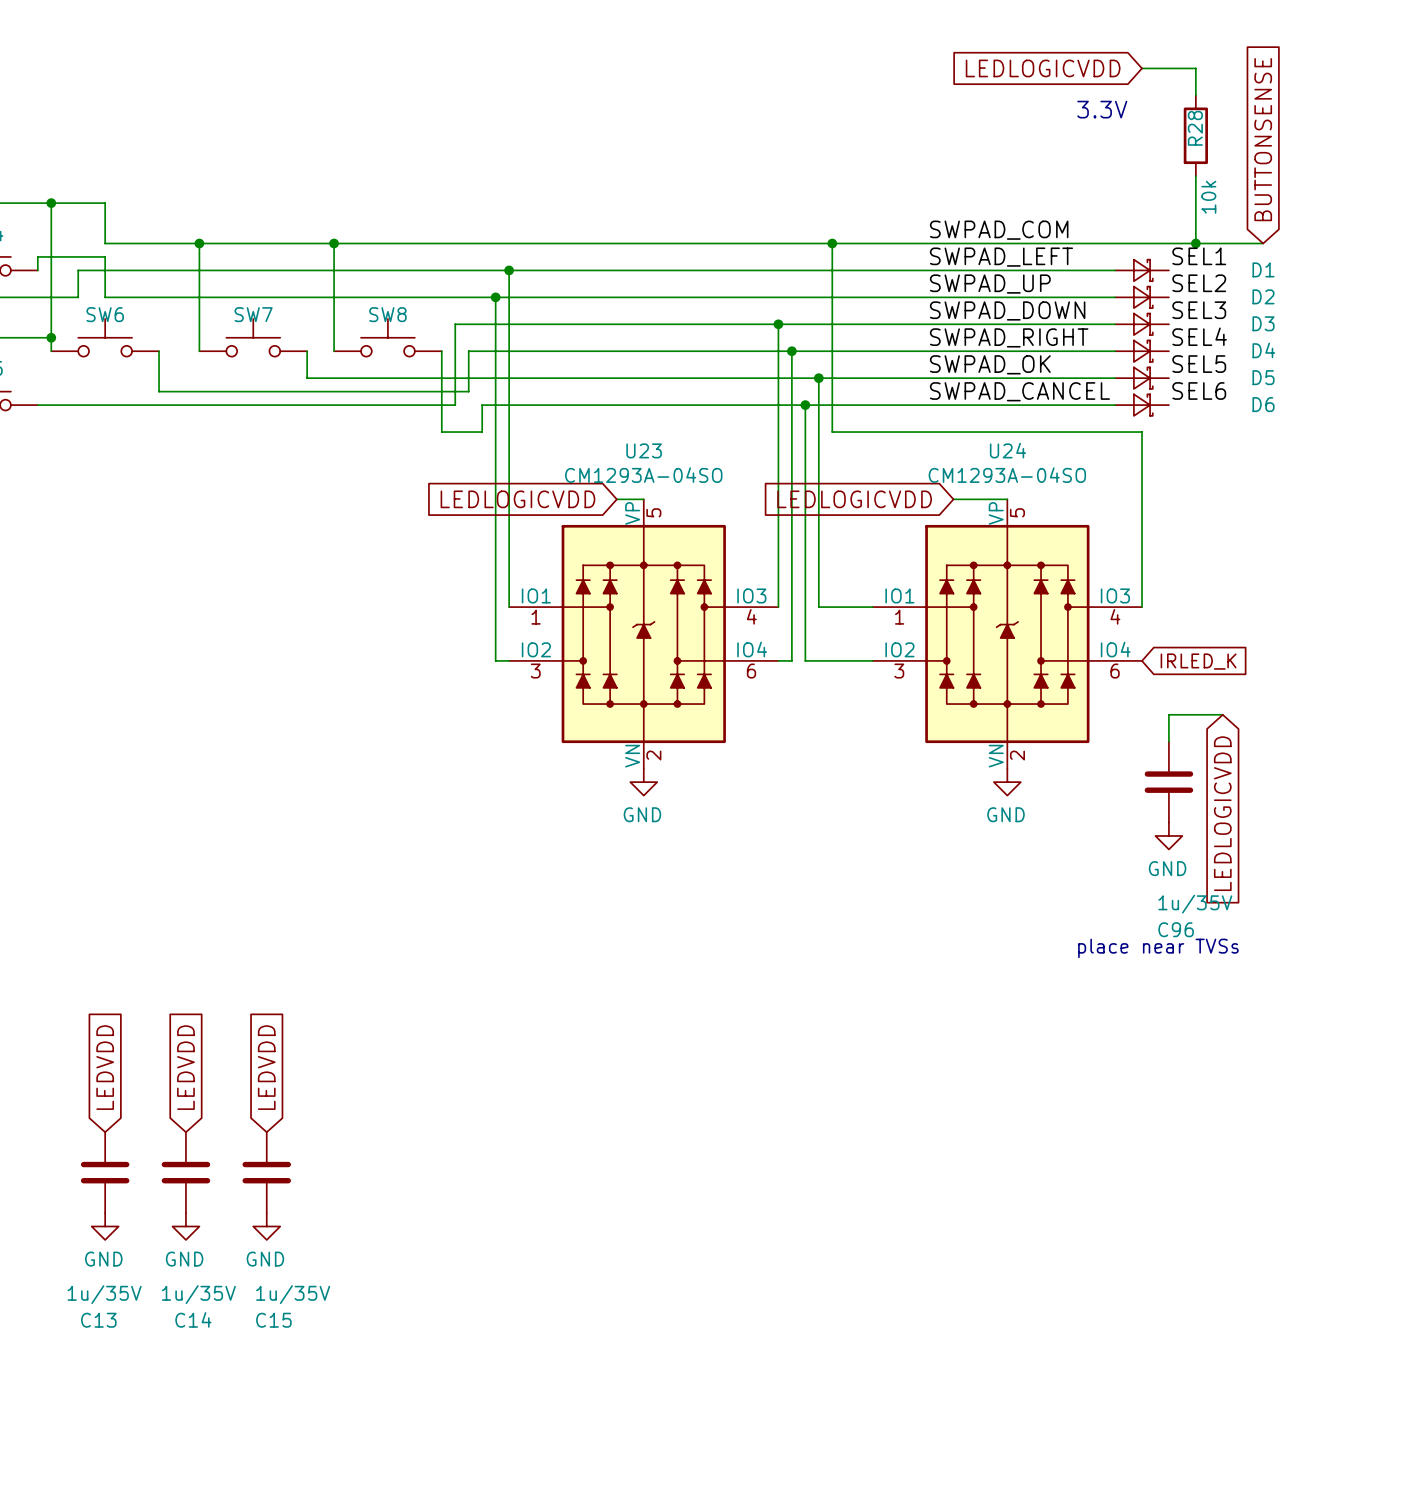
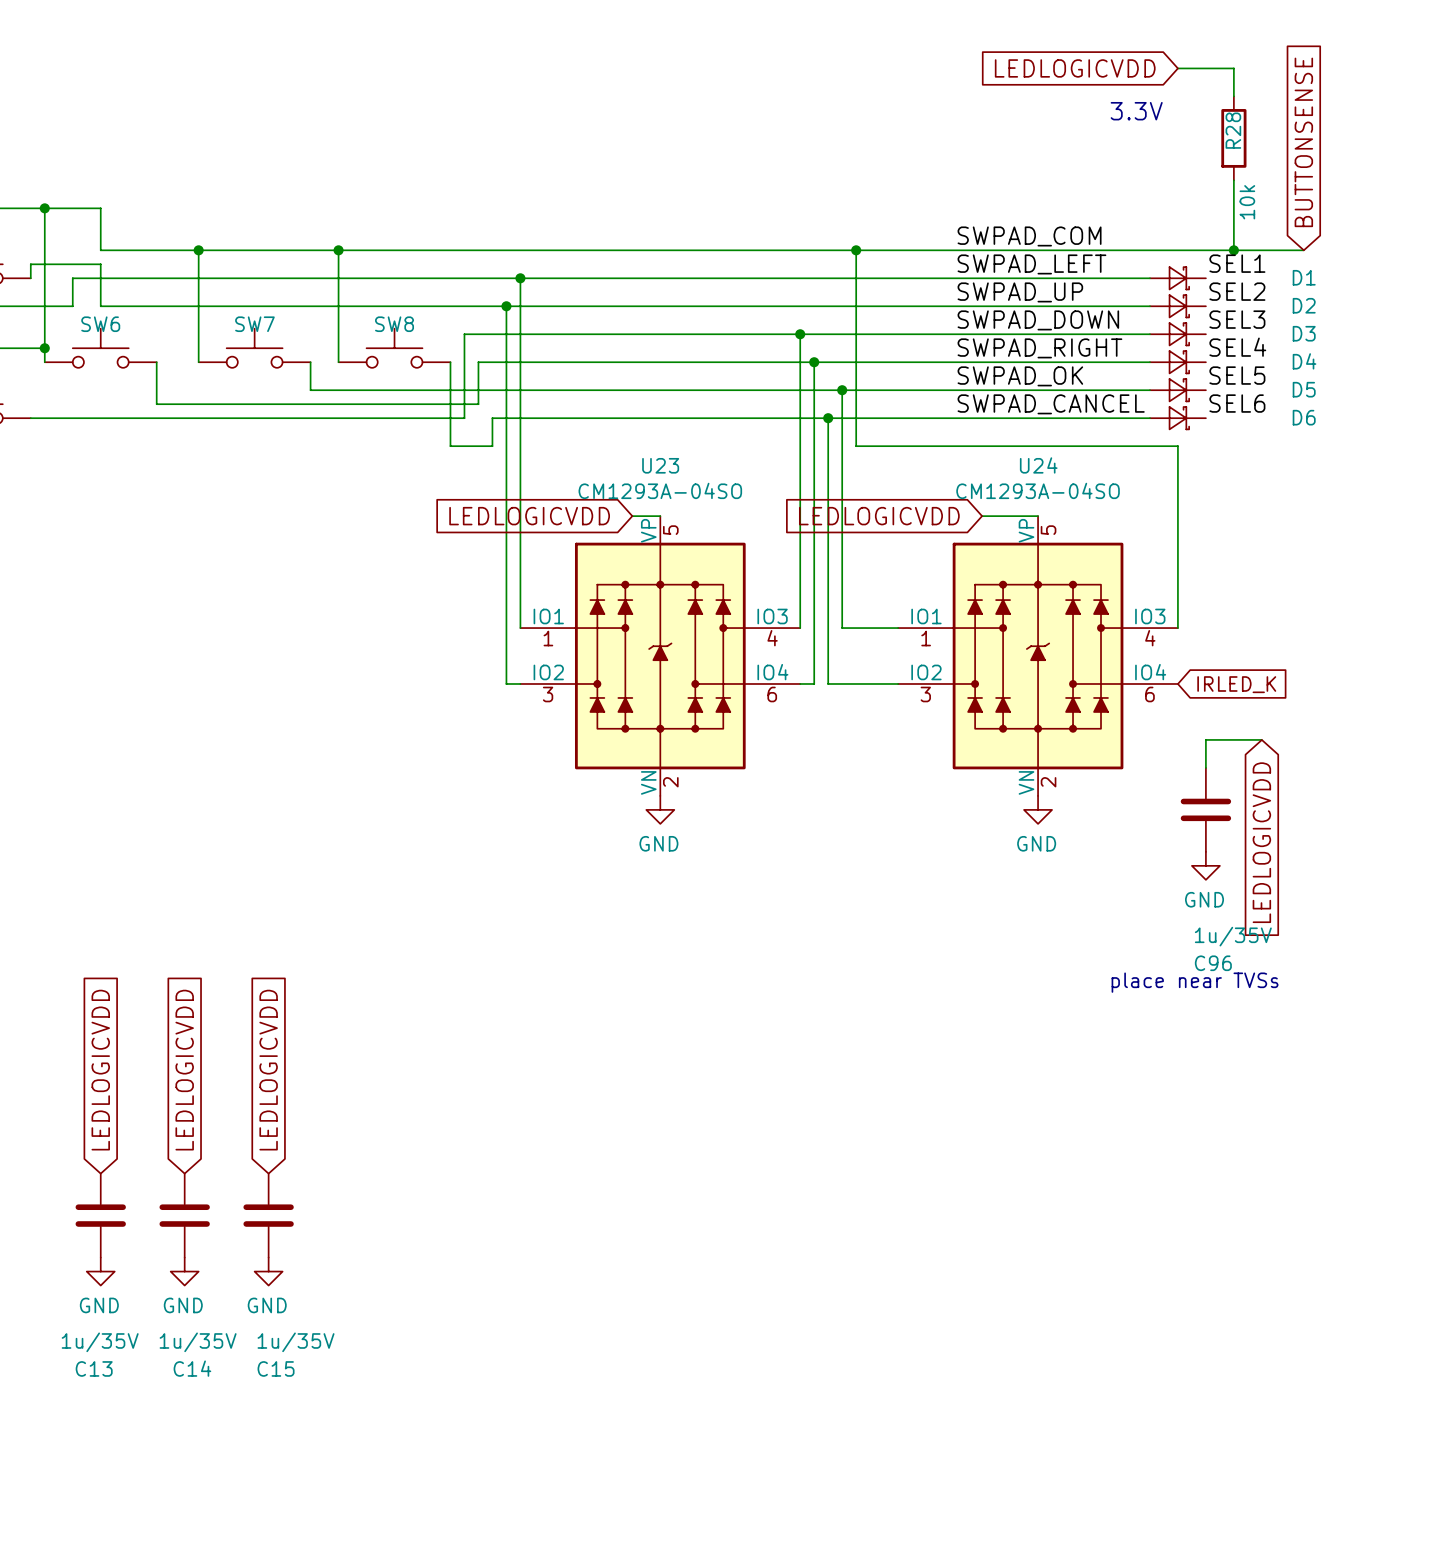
global label: LEDVDD (105, 1067) -> LEDLOGICVDD (100, 1070)
global label: LEDVDD (185, 1067) -> LEDLOGICVDD (184, 1070)
global label: LEDVDD (266, 1067) -> LEDLOGICVDD (268, 1070)

